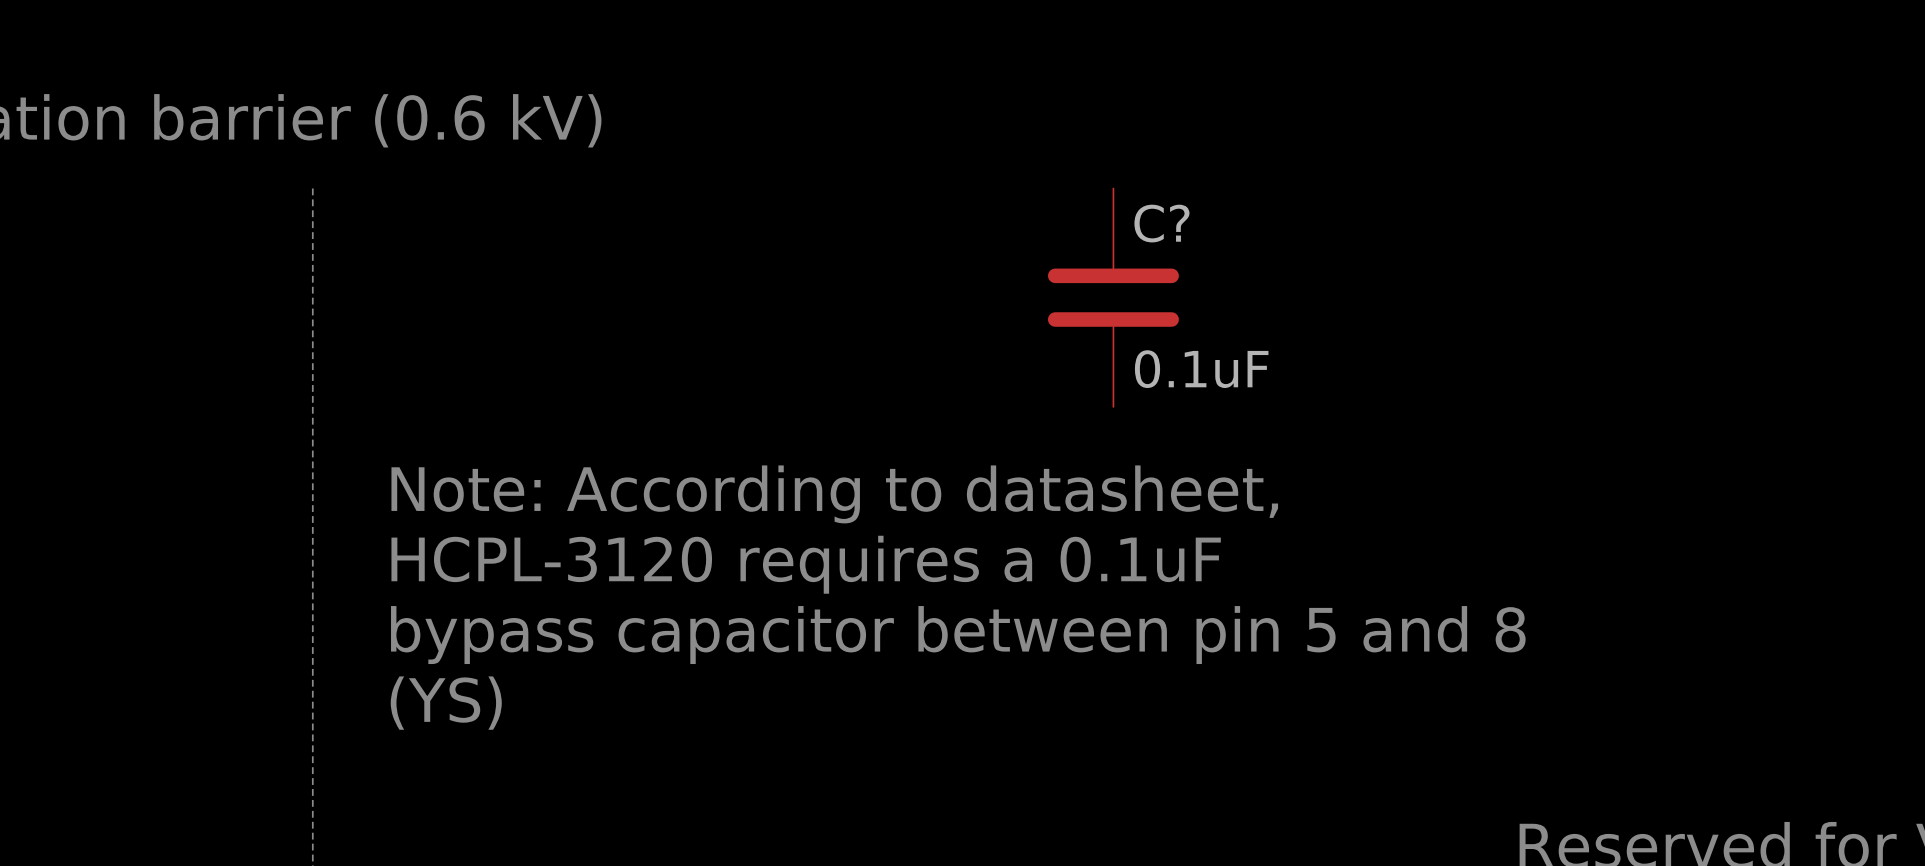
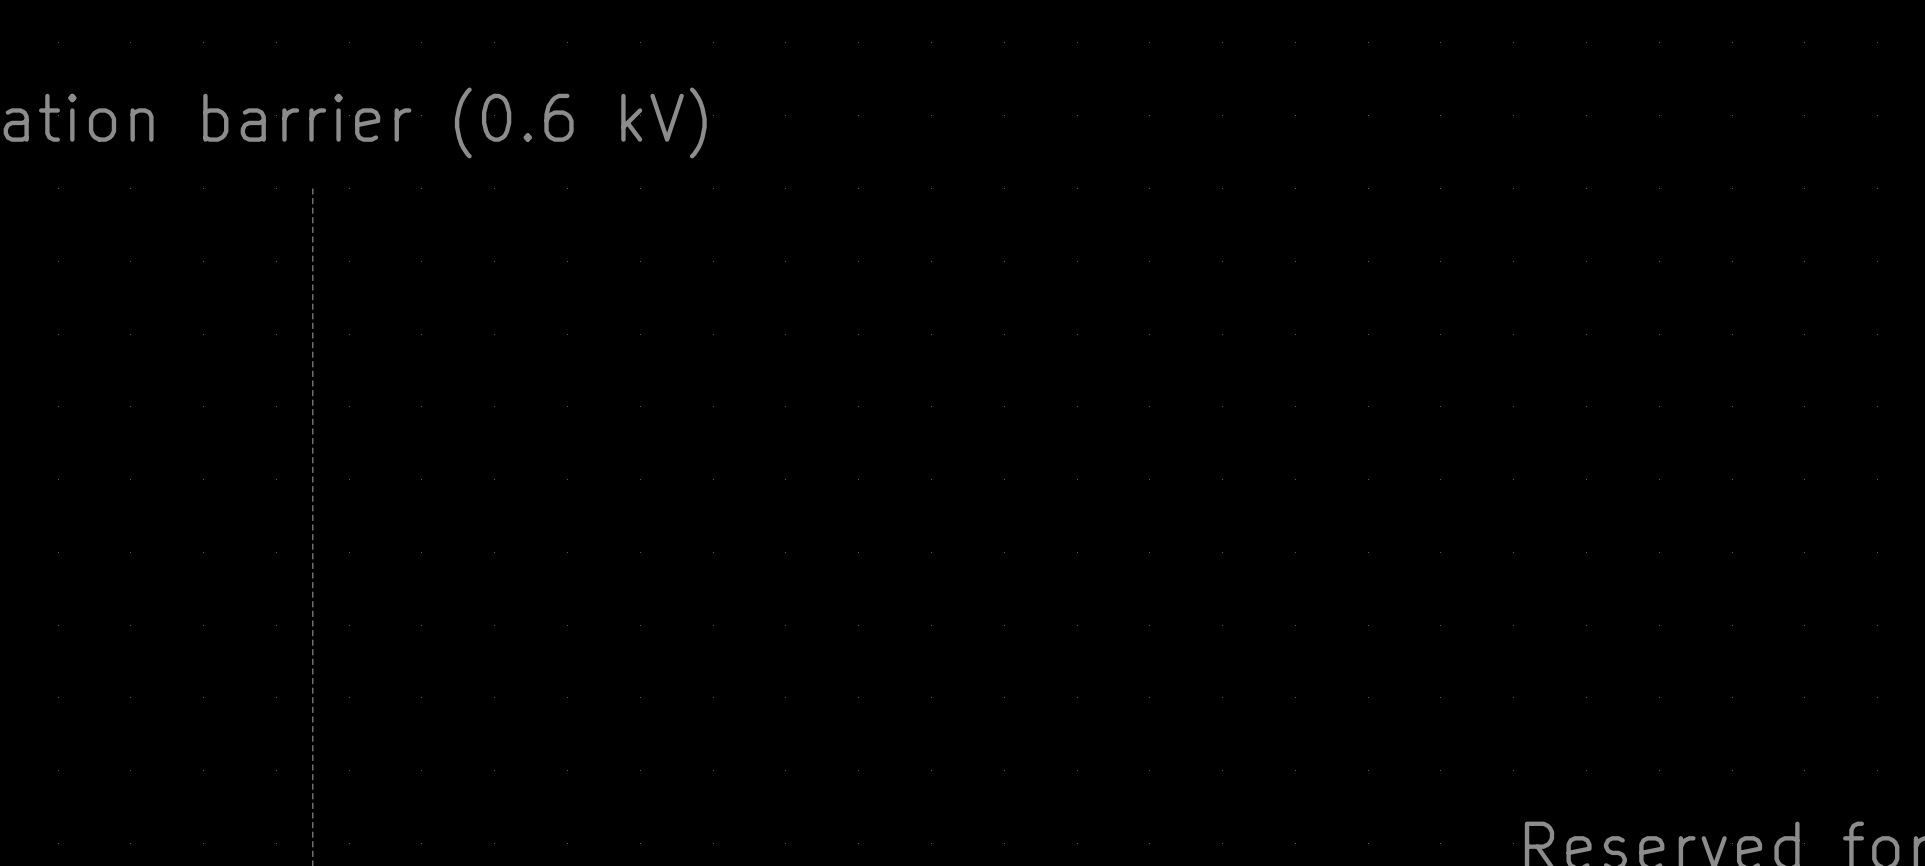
C?: 0.1uF (1113, 297) -> none
text: Note: According to datasheet, (834, 494) -> none
text: HCPL-3120 requires a 0.1uF (806, 564) -> none
text: bypass capacitor between pin 5 and 8 (958, 635) -> none
text: (YS) (446, 703) -> none

